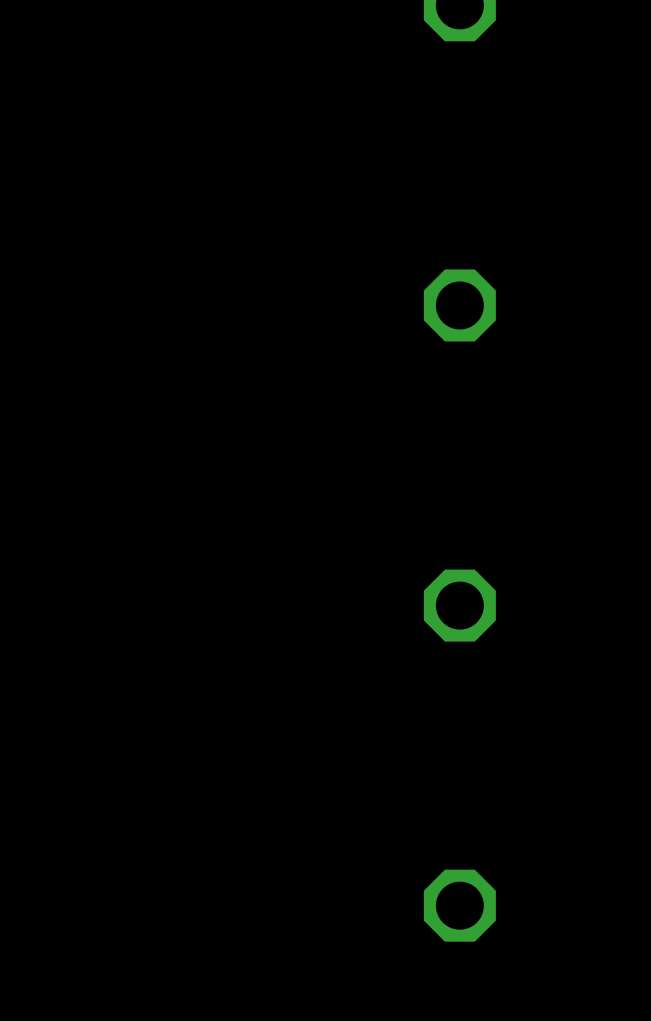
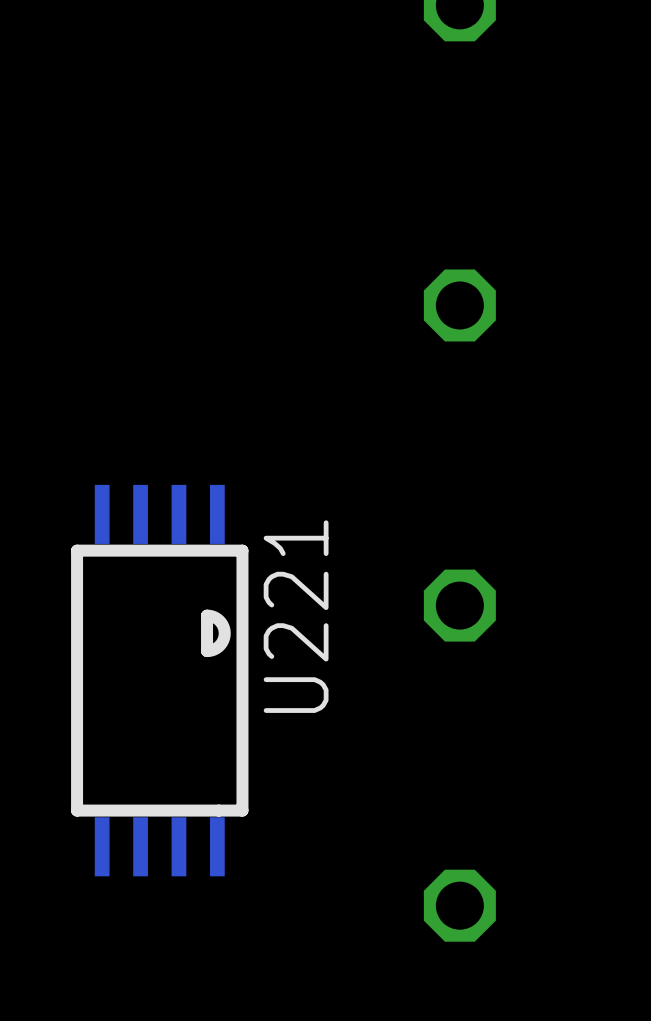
U221: none -> (159, 680)

